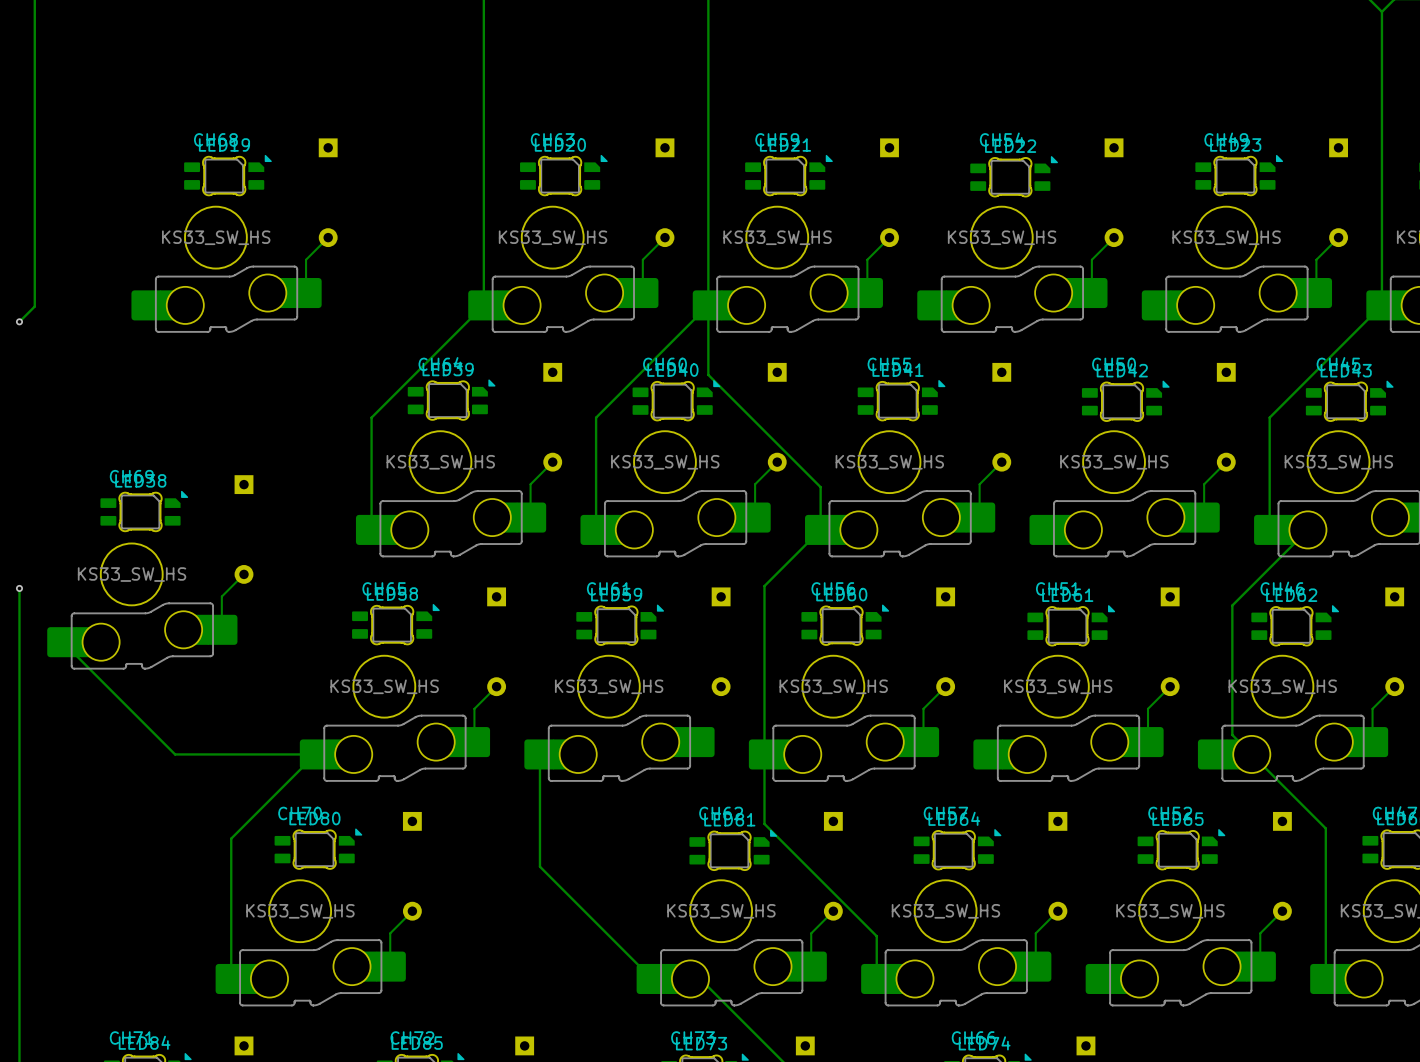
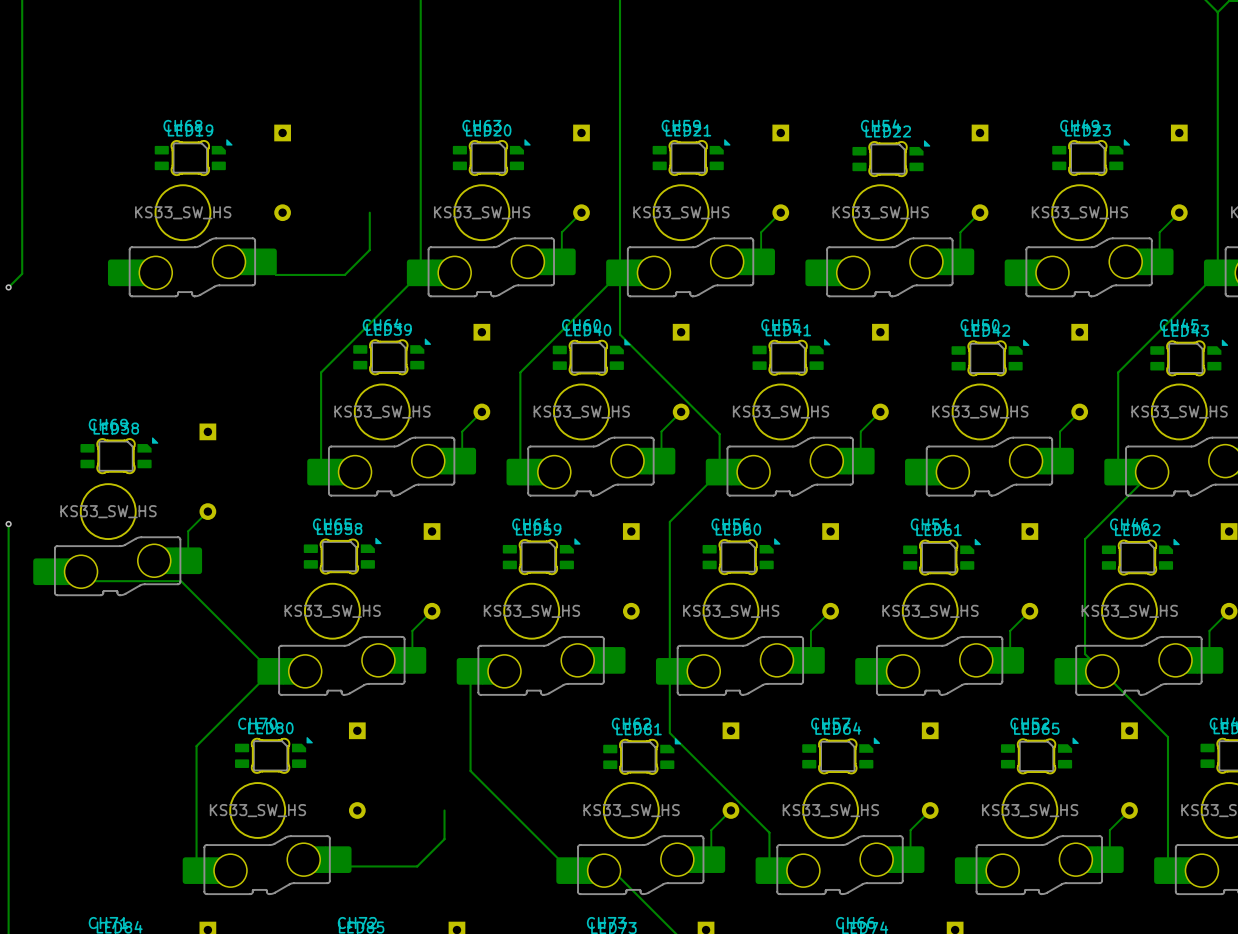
track: (328, 237) (306, 259) (306, 293) -> (369, 212) (369, 250) (344, 274) (276, 274) (262, 261)
track: (62, 642) (175, 754) (315, 754) -> (81, 571) (90, 581) (181, 581) (271, 671)
track: (412, 911) (390, 933) (390, 966) -> (444, 810) (444, 839) (417, 866) (344, 866) (337, 859)

